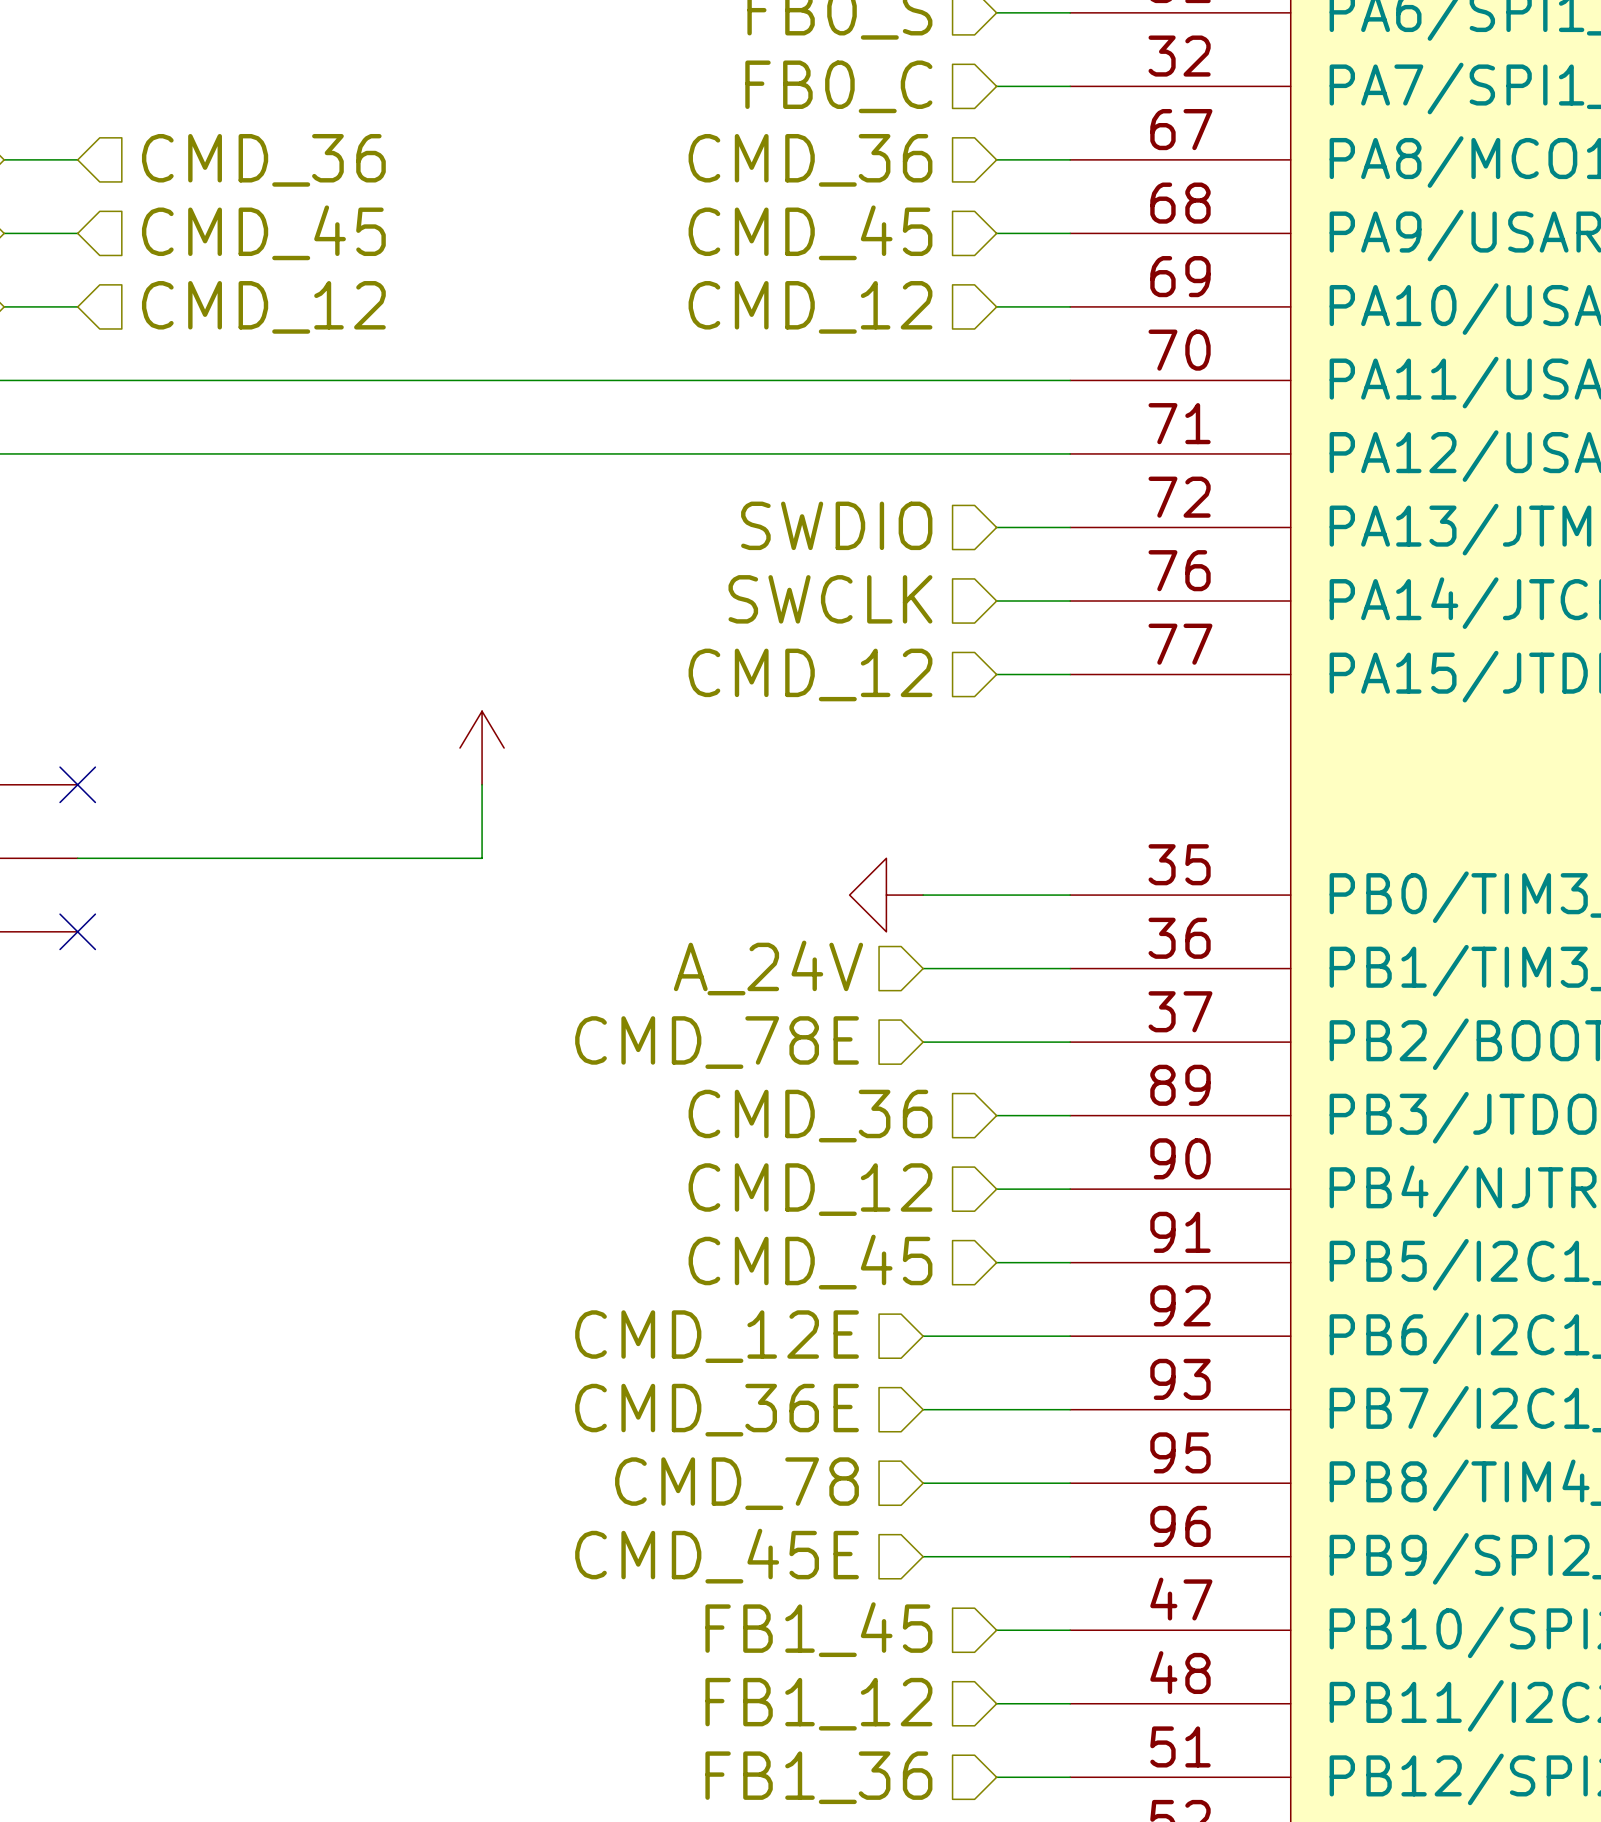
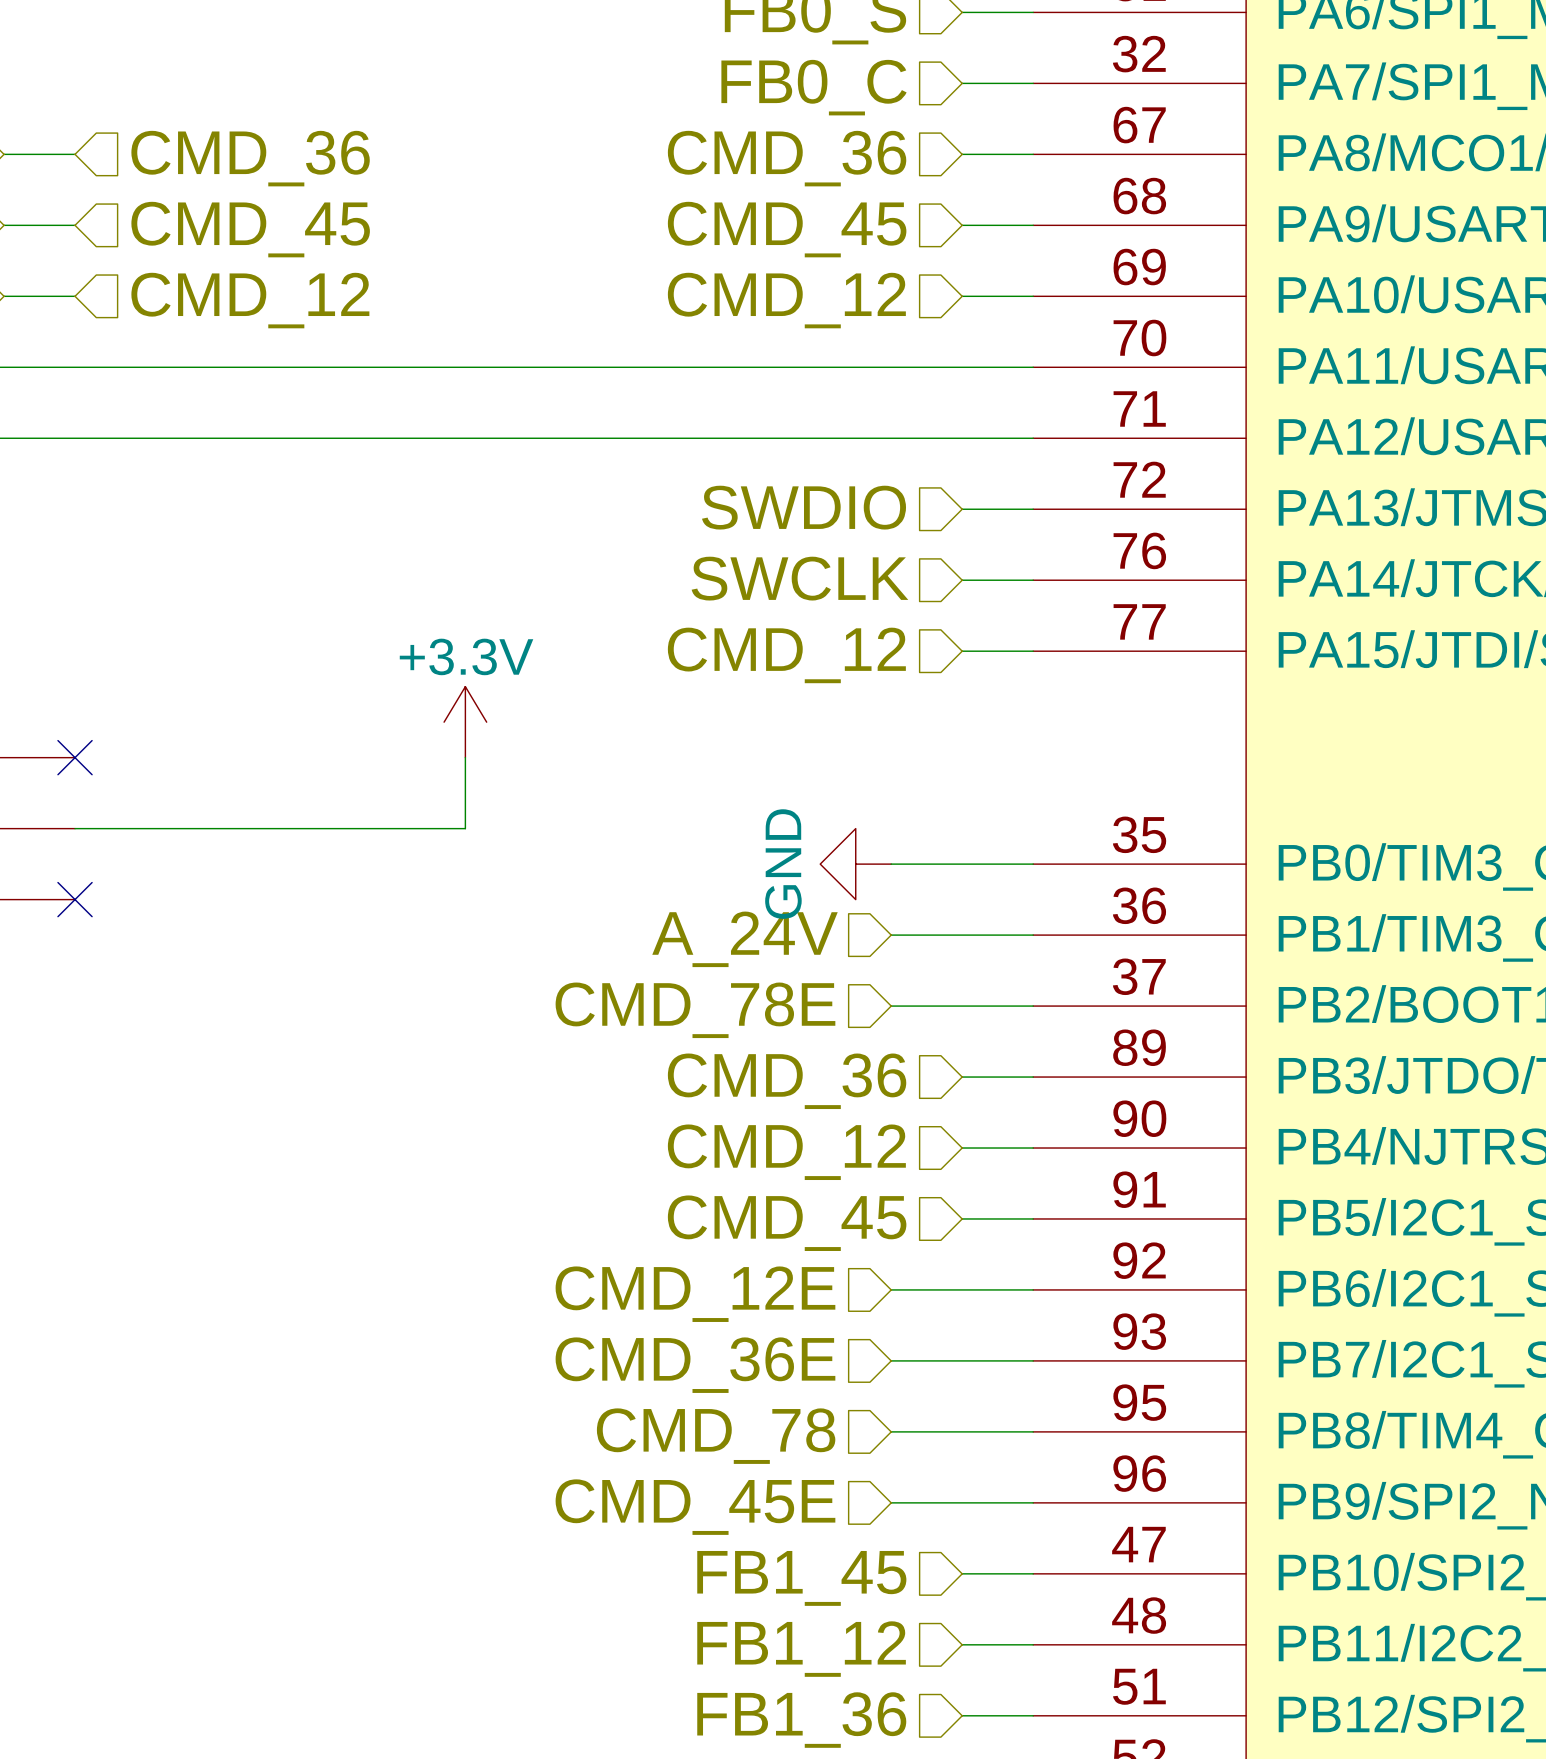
power symbol text: none -> +3.3V (466, 656)
power symbol text: none -> GND (783, 864)

